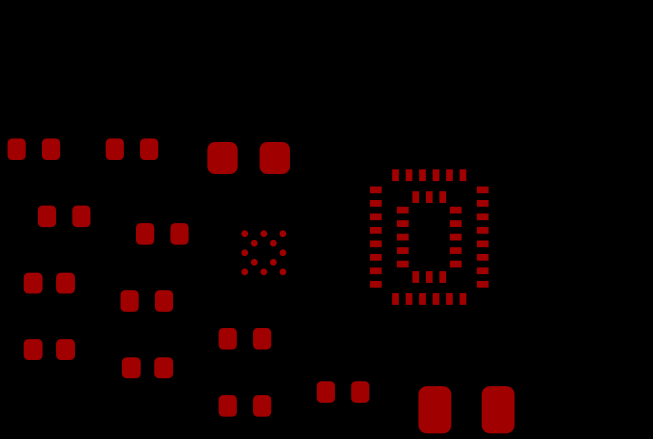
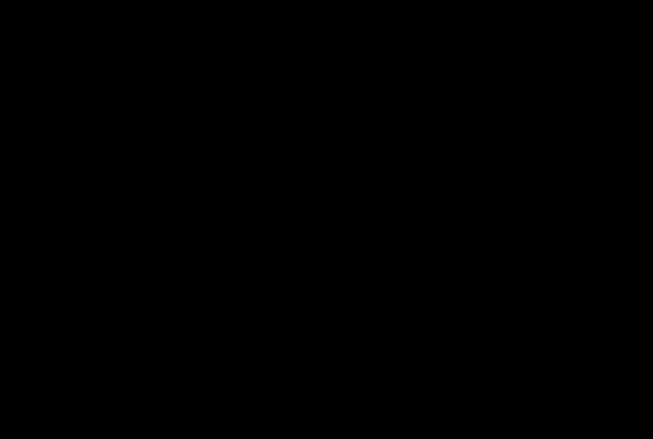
part: (33, 149) -> none
part: (131, 149) -> none
part: (248, 158) -> none
part: (64, 216) -> none
part: (162, 233) -> none
part: (429, 237) -> none
part: (263, 252) -> none
part: (49, 283) -> none
part: (146, 300) -> none
part: (244, 338) -> none
part: (49, 349) -> none
part: (147, 367) -> none
part: (343, 392) -> none
part: (244, 405) -> none
part: (466, 409) -> none

